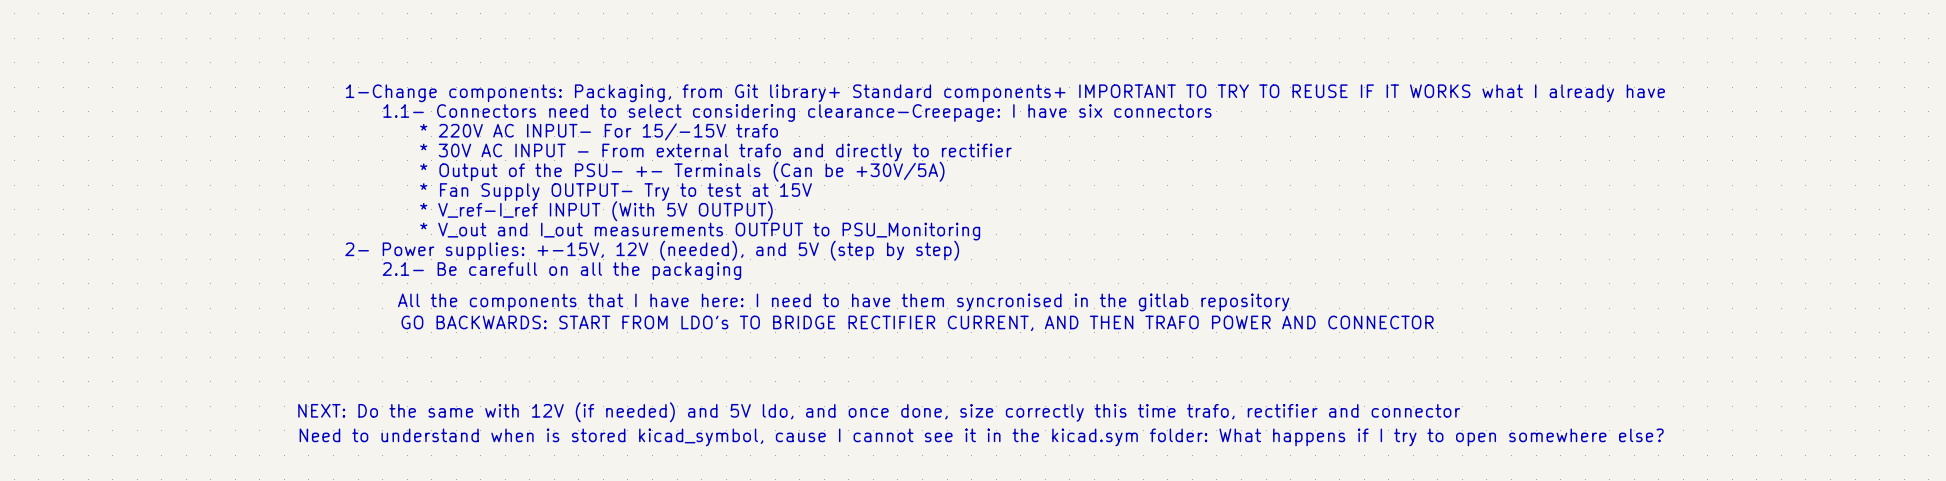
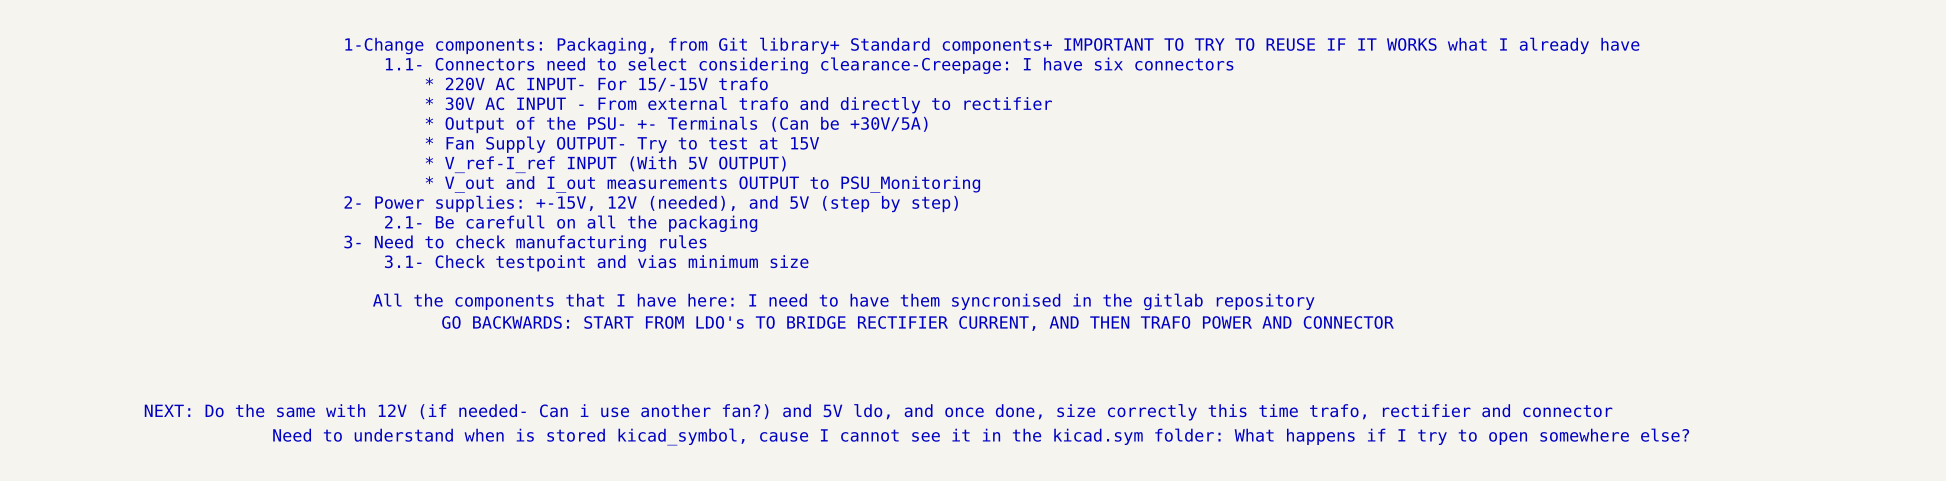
text position: 1-Change components: Packaging, from Git library+ Standard components+ IMPORTANT TO TRY TO REUSE IF IT WORKS what I already have (1005, 93) -> 1-Change components: Packaging, from Git library+ Standard components+ IMPORTANT TO TRY TO REUSE IF IT WORKS what I already have (992, 45)
text position: 1.1- Connectors need to select considering clearance-Creepage: I have six connectors (797, 113) -> 1.1- Connectors need to select considering clearance-Creepage: I have six connectors (809, 65)
text position: * 220V AC INPUT- For 15/-15V trafo (599, 131) -> * 220V AC INPUT- For 15/-15V trafo (596, 84)
text position: * 30V AC INPUT - From external trafo and directly to rectifier (715, 152) -> * 30V AC INPUT - From external trafo and directly to rectifier (738, 105)
text position: * Output of the PSU- +- Terminals (Can be +30V/5A) (682, 171) -> * Output of the PSU- +- Terminals (Can be +30V/5A) (676, 124)
text position: * Fan Supply OUTPUT- Try to test at 15V (615, 192) -> * Fan Supply OUTPUT- Try to test at 15V (622, 144)
text position: * V_ref-I_ref INPUT (With 5V OUTPUT) (596, 211) -> * V_ref-I_ref INPUT (With 5V OUTPUT) (605, 164)
text position: * V_out and I_out measurements OUTPUT to PSU_Monitoring (700, 231) -> * V_out and I_out measurements OUTPUT to PSU_Monitoring (702, 184)
text: none -> 3- Need to check manufacturing rules (525, 243)
text position: 2- Power supplies: +-15V, 12V (needed), and 5V (step by step) (652, 250) -> 2- Power supplies: +-15V, 12V (needed), and 5V (step by step) (651, 203)
text: none -> 3.1- Check testpoint and vias minimum size (596, 263)
text position: 2.1- Be carefull on all the packaging (561, 271) -> 2.1- Be carefull on all the packaging (571, 223)
text: NEXT: Do the same with 12V (if needed) and 5V ldo, and once done, size correctly this time trafo, rectifier and connector (879, 412) -> NEXT: Do the same with 12V (if needed- Can i use another fan?) and 5V ldo, and once done, size correctly this time trafo, rectifier and connector (878, 412)

